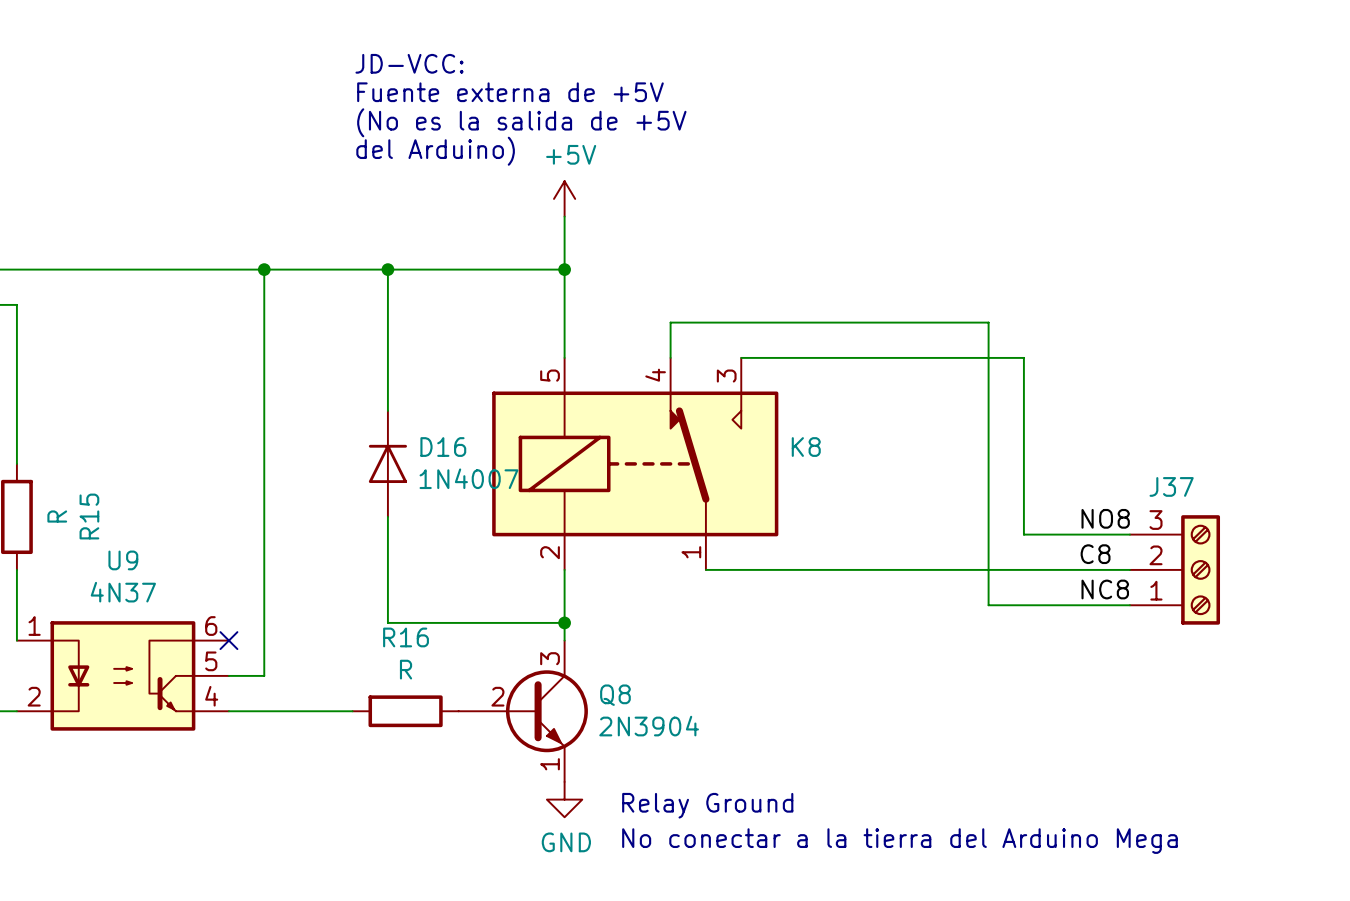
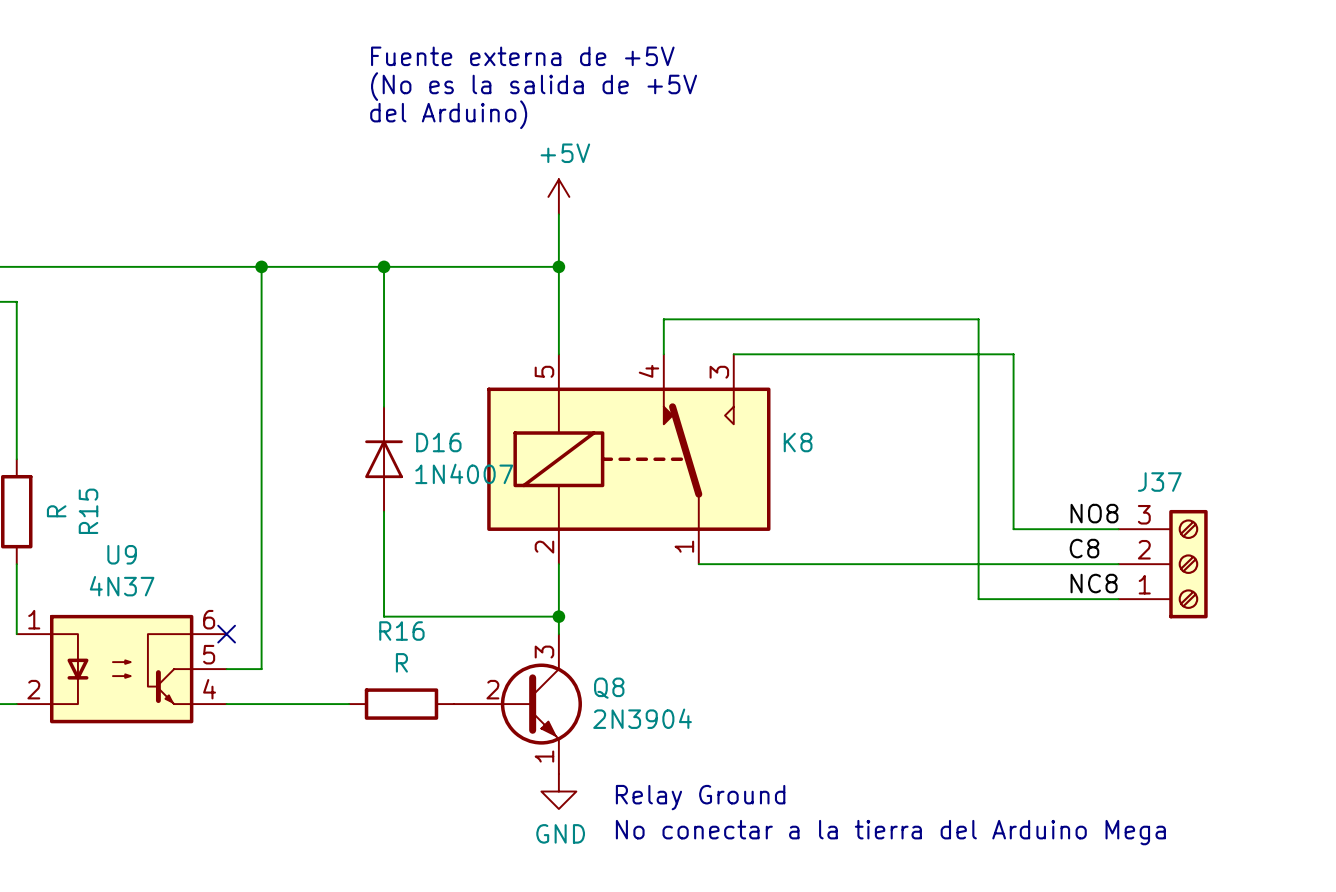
text: JD-VCC: (409, 63) -> none
text position: Fuente externa de +5V (510, 92) -> Fuente externa de +5V (522, 56)
text position: (No es la salida de +5V (521, 122) -> (No es la salida de +5V (534, 86)
text position: del Arduino) (435, 151) -> del Arduino) (448, 114)

